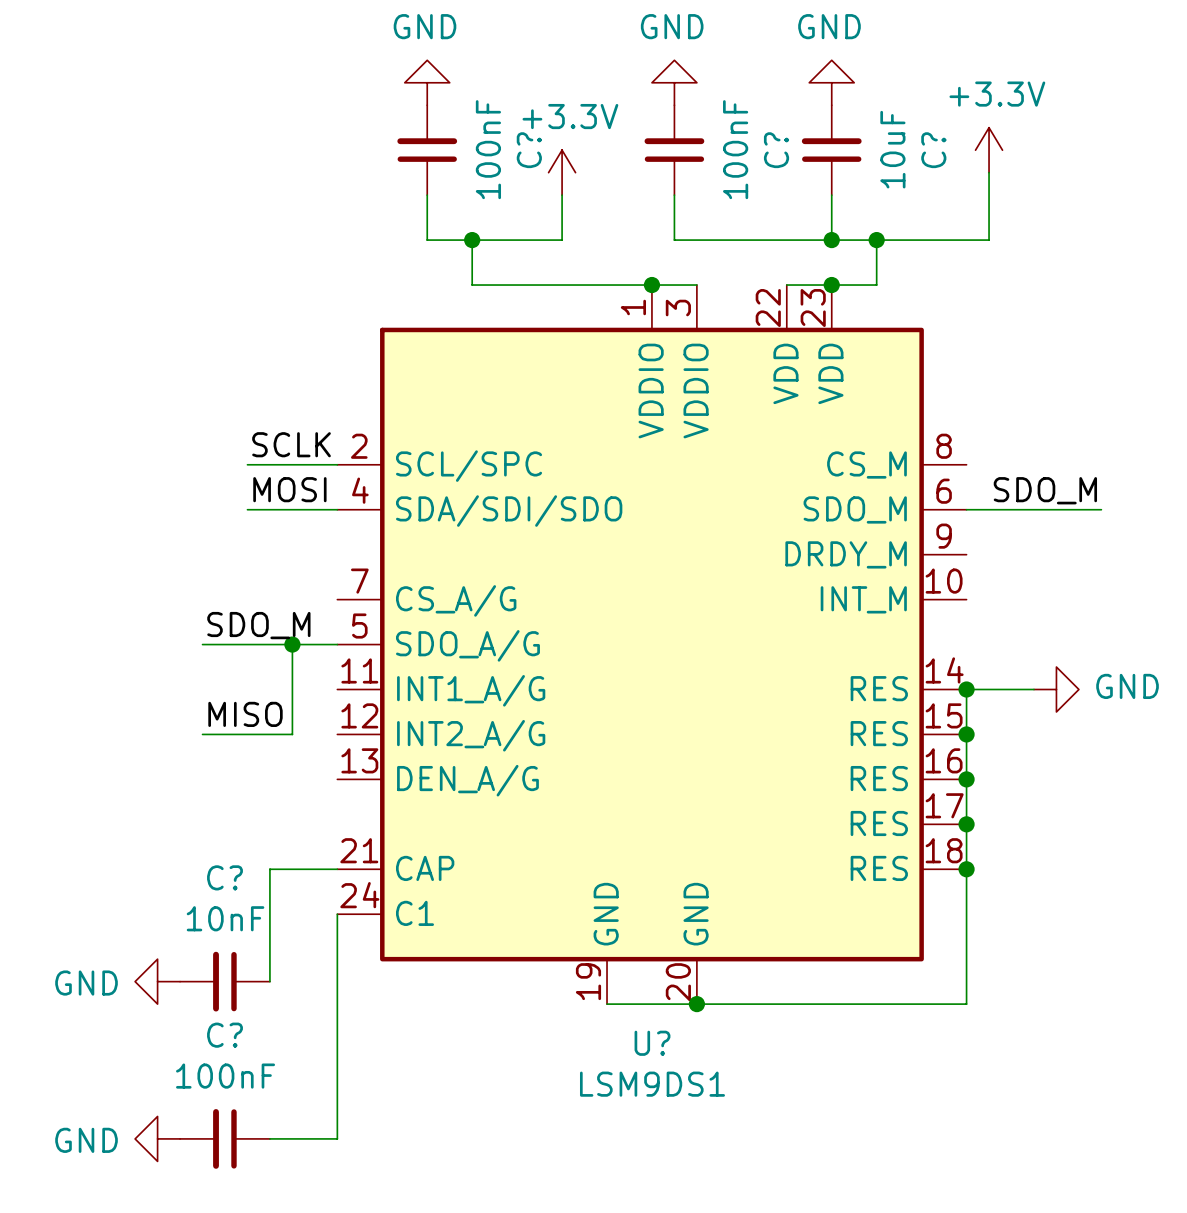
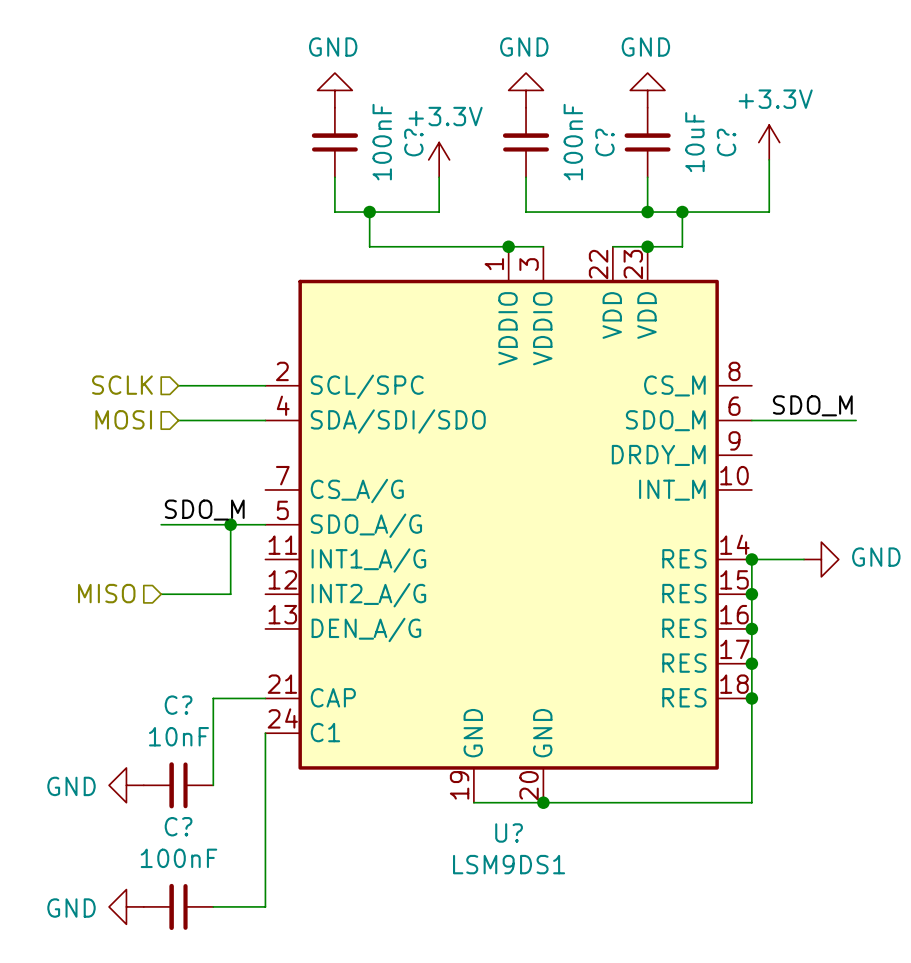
label: SCLK (291, 444) -> none
hierarchical label: none -> SCLK (122, 385)
wire: none -> (178, 385) (195, 385)
label: MOSI (289, 489) -> none
hierarchical label: none -> MOSI (123, 419)
wire: none -> (178, 420) (195, 420)
label: MISO (245, 714) -> none
hierarchical label: none -> MISO (106, 593)

